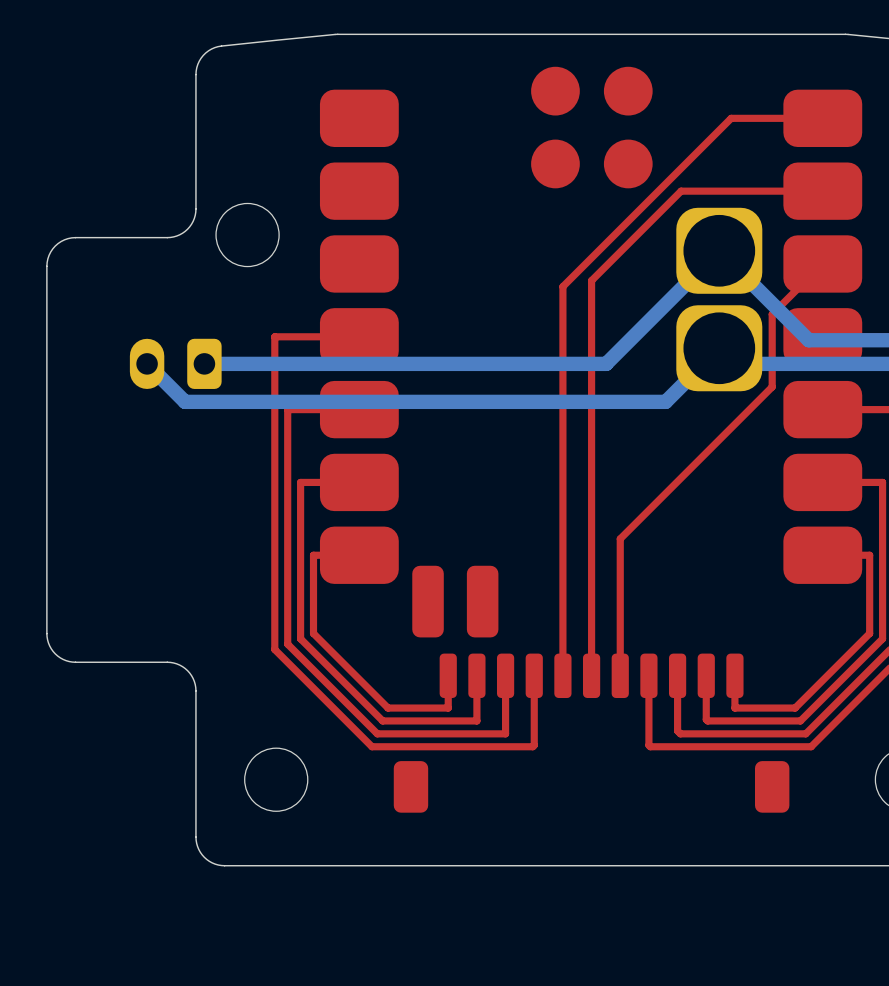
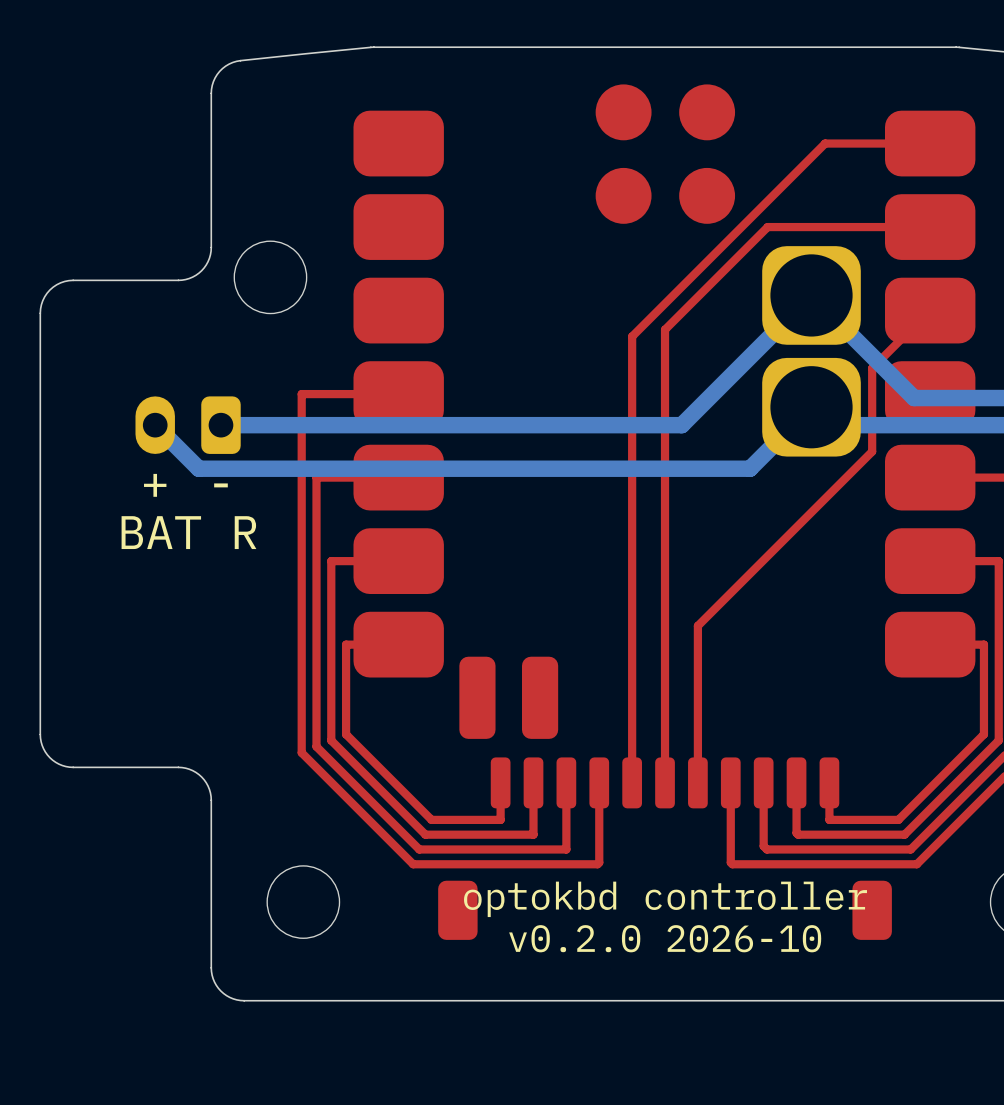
text: none -> + (155, 485)
text: none -> - (220, 485)
text: none -> BAT R (188, 532)
text: none -> optokbd controller (665, 899)
text: none -> v0.2.0 2026-10 (665, 938)

